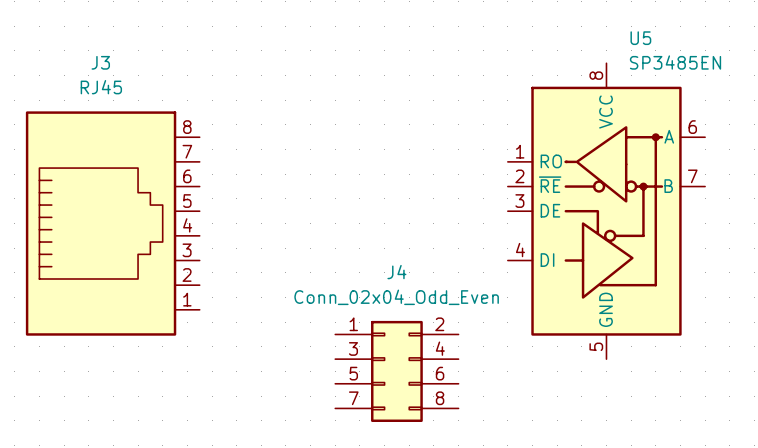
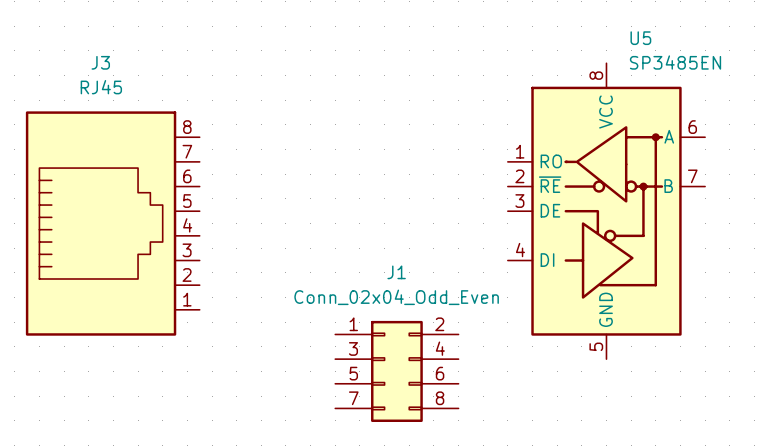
J4 name: J4 (396, 272) -> J1 (396, 272)

